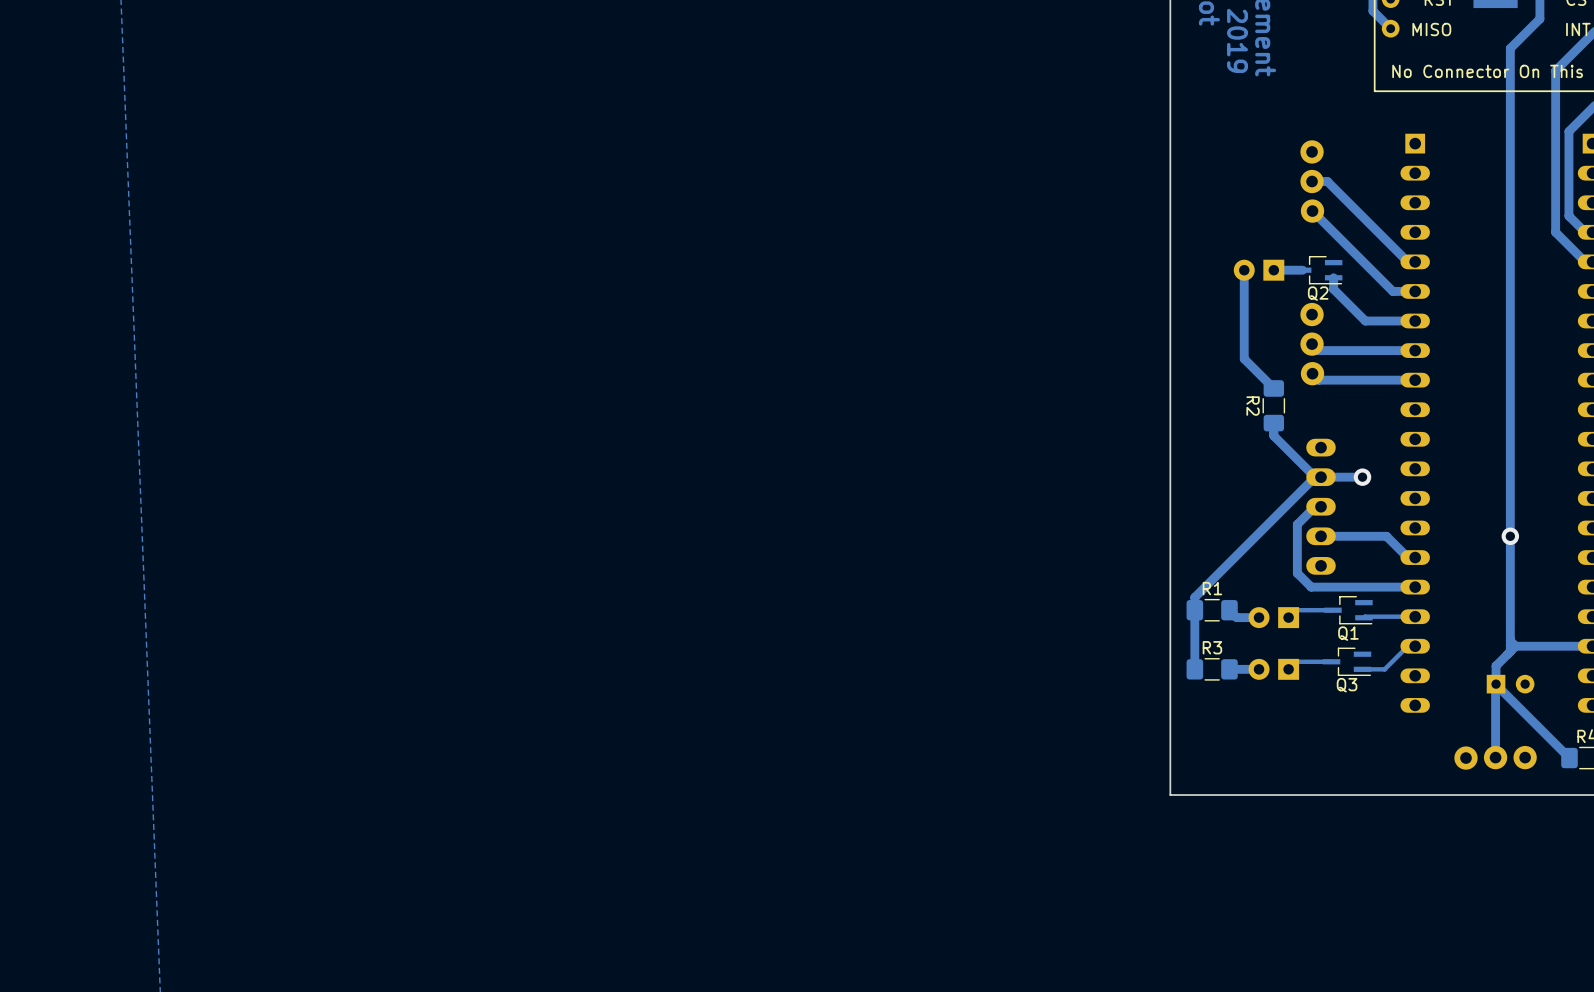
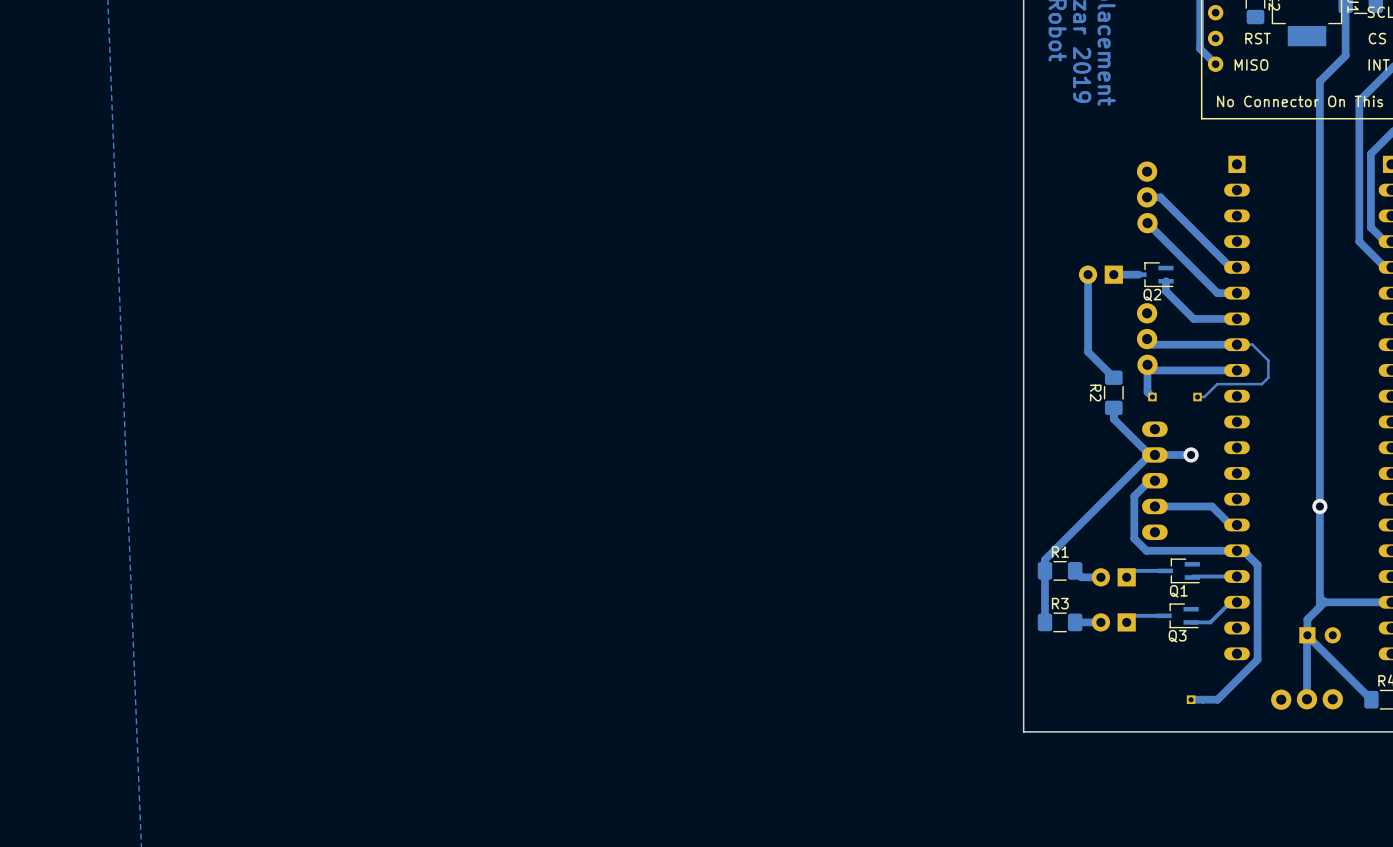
track: none -> (1236, 344) (1252, 344) (1268, 360) (1268, 377) (1261, 384) (1217, 384) (1204, 397) (1197, 397)
track: none -> (1147, 364) (1147, 392) (1152, 397)
part: none -> (1152, 397)
part: none -> (1197, 397)
track: none -> (1236, 550) (1243, 550) (1257, 564) (1257, 659) (1217, 699) (1191, 699)
part: none -> (1191, 699)

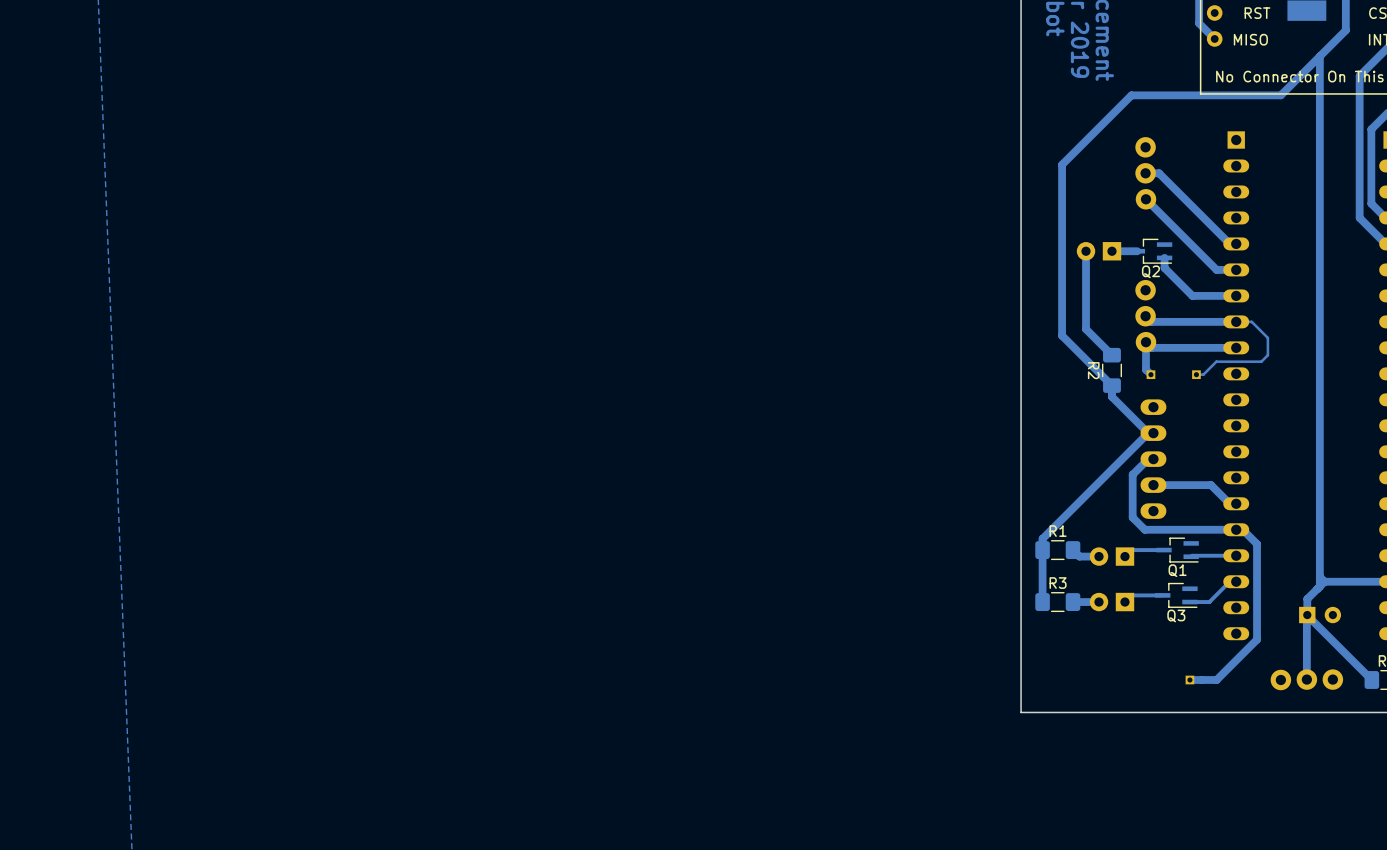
track: none -> (1319, 56) (1280, 95) (1131, 95) (1062, 164) (1062, 335) (1111, 385)
track: (1191, 454) (1154, 454) -> none
via: (1191, 454) -> none
via: (1319, 506) -> none

